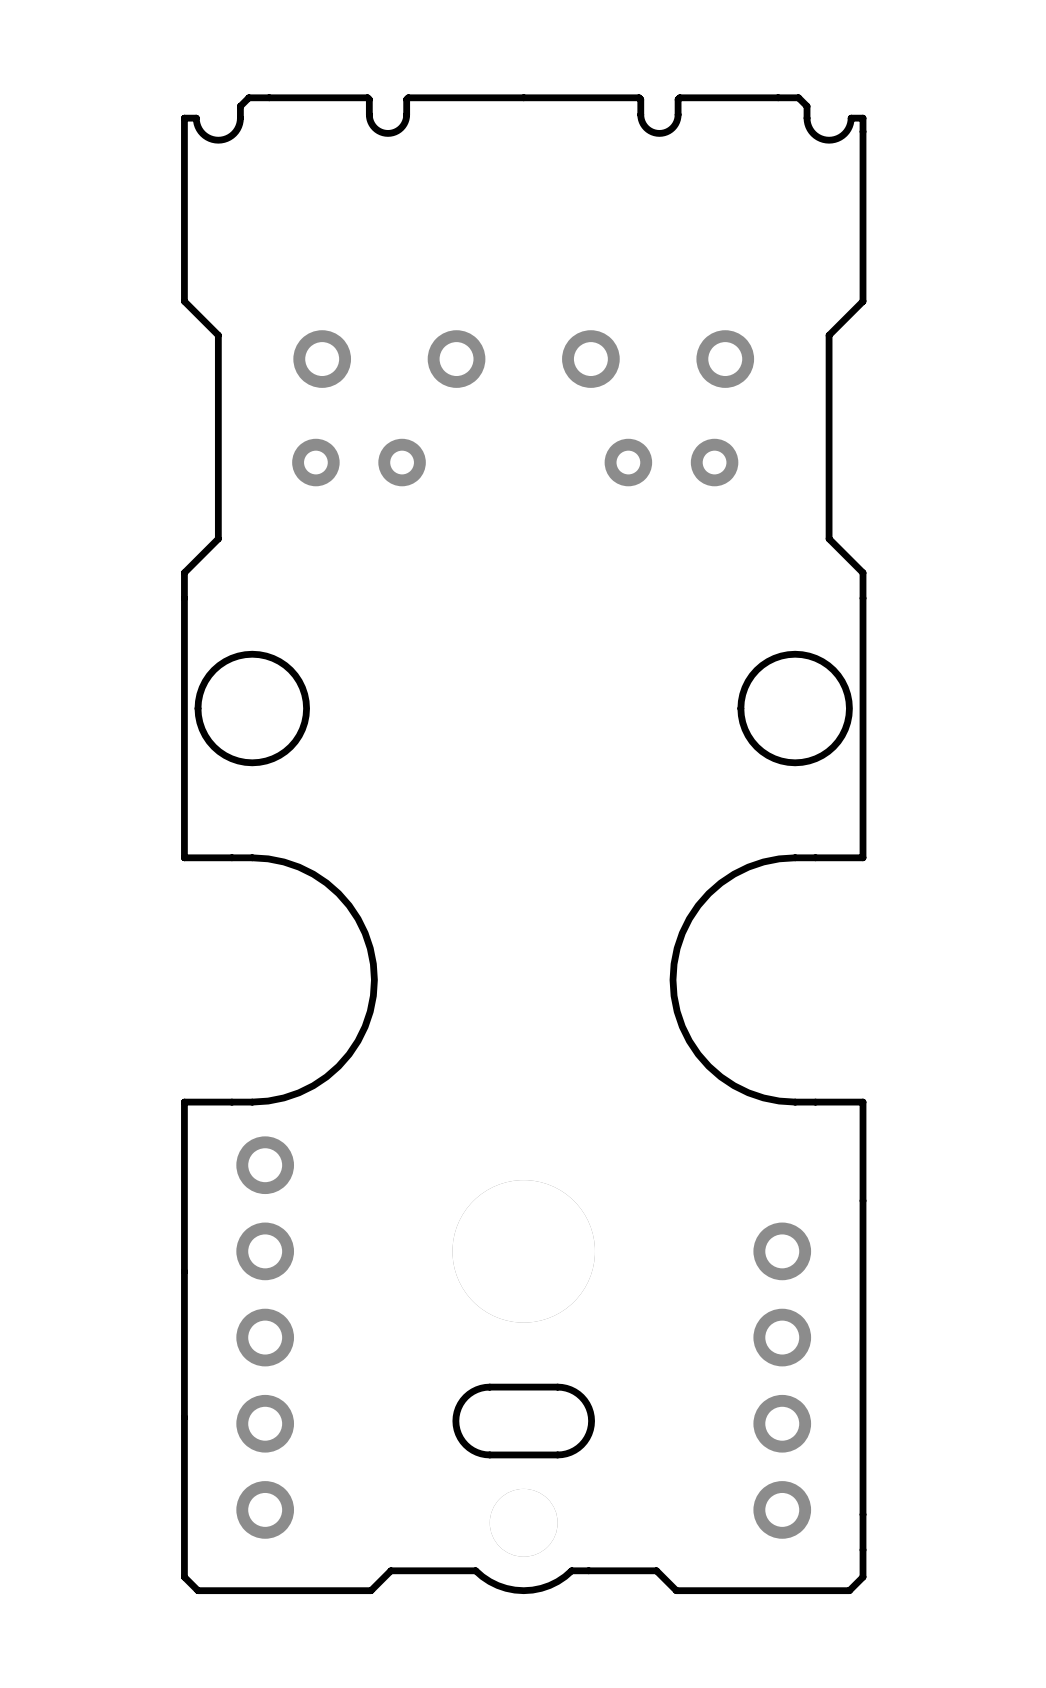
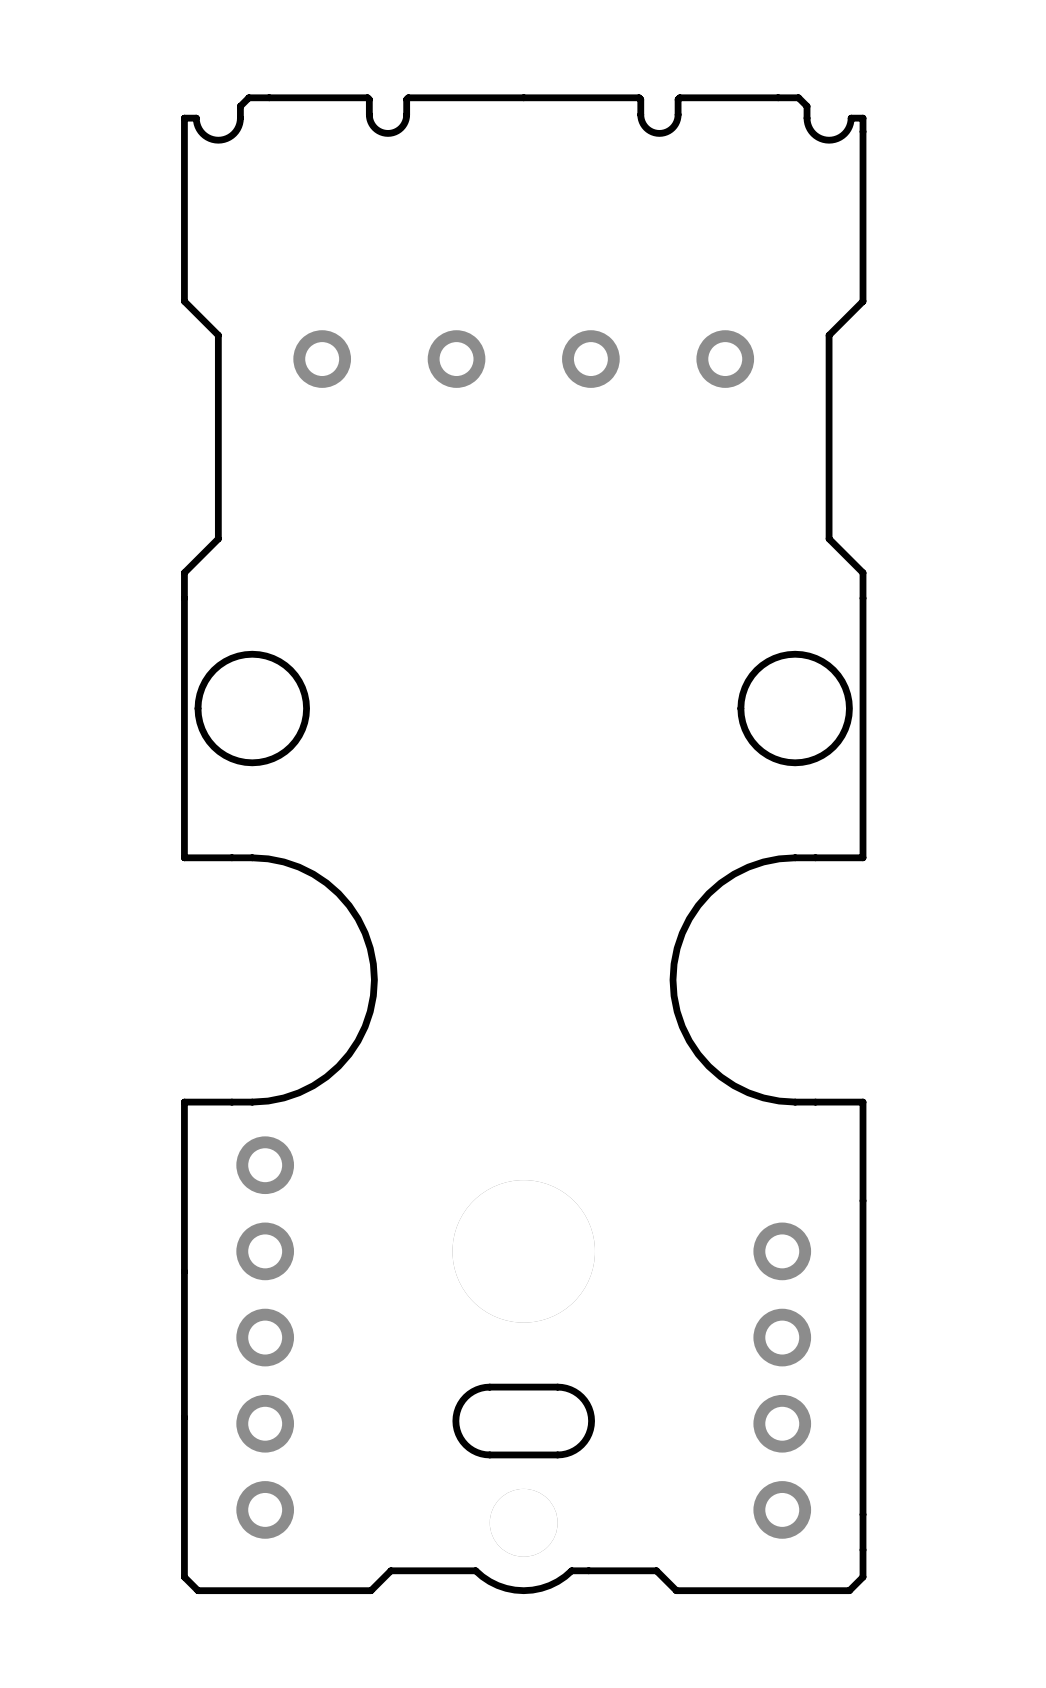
part: (358, 462) -> none
part: (671, 462) -> none

